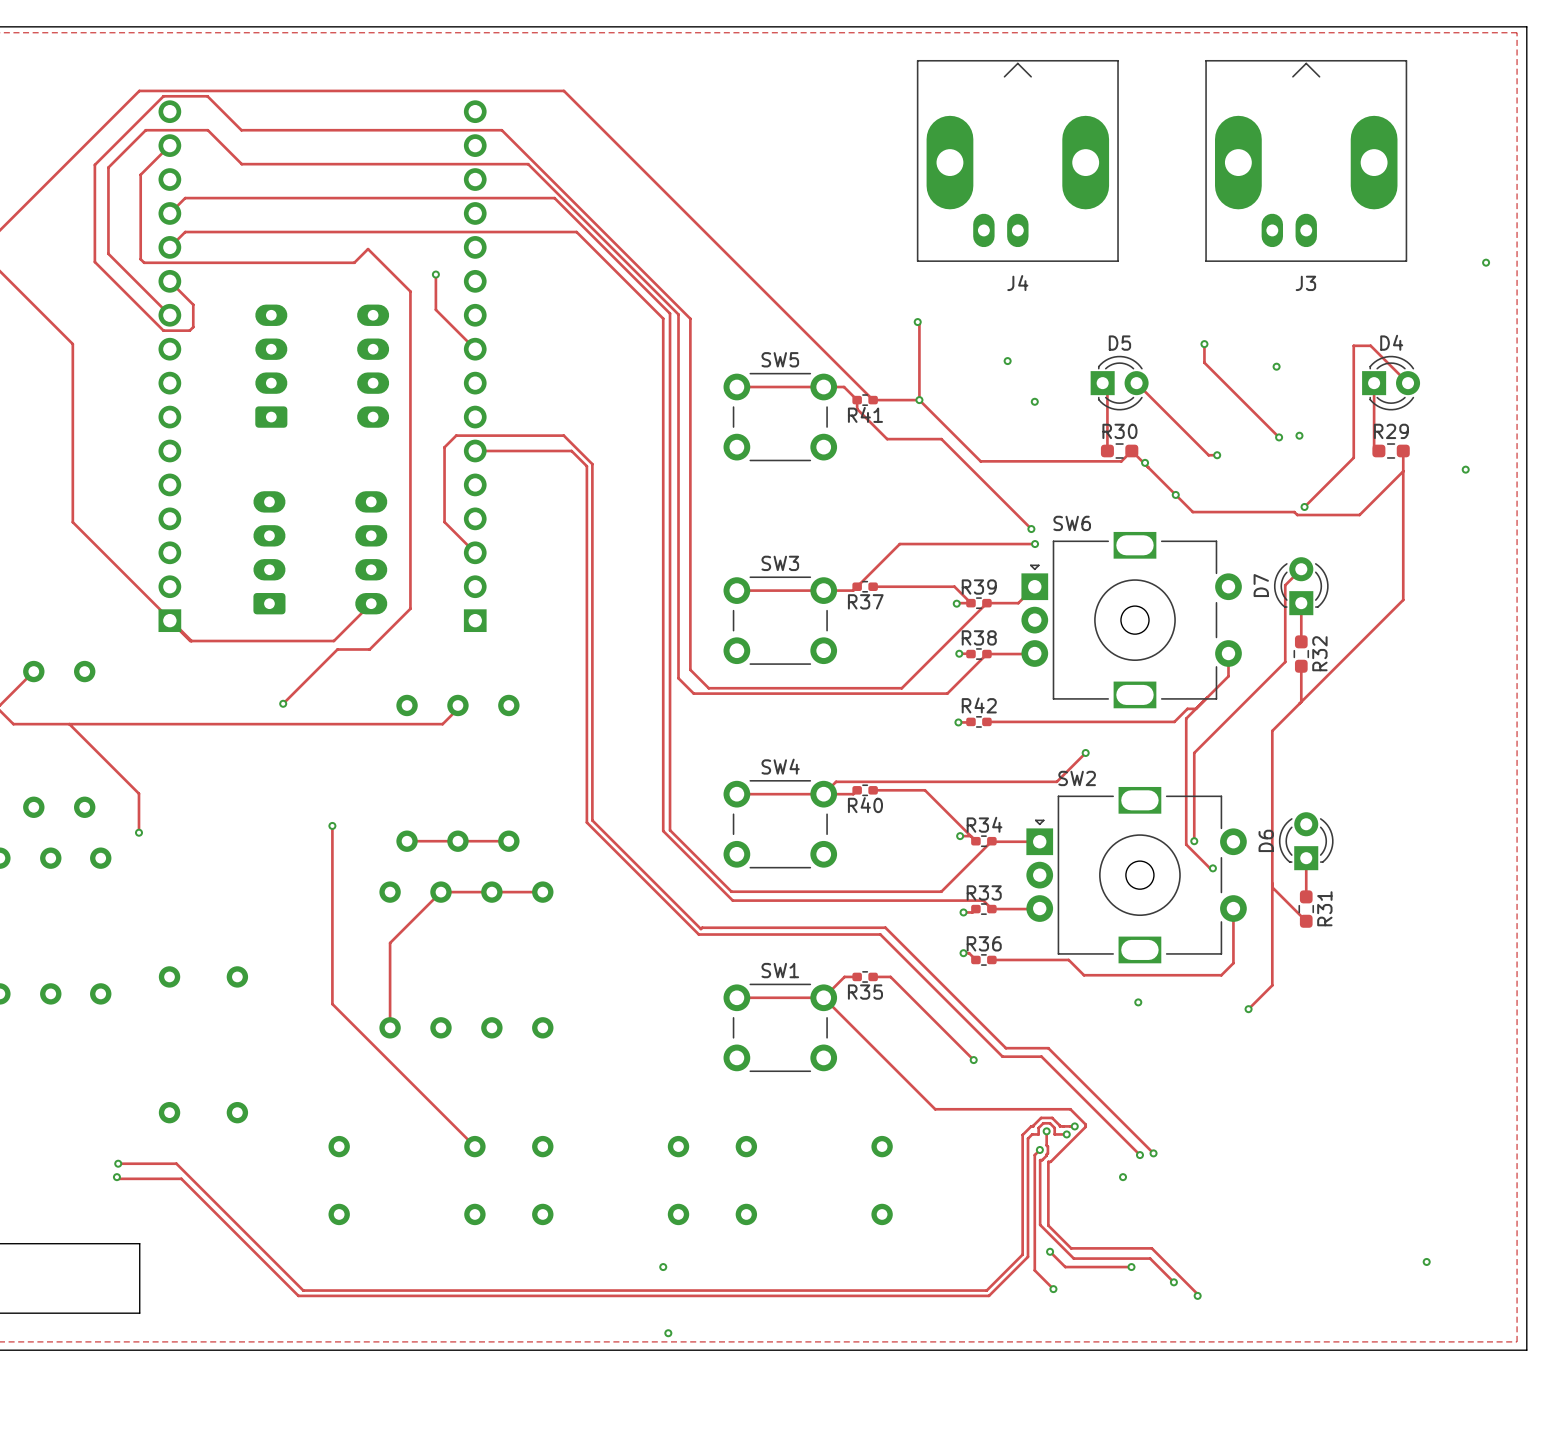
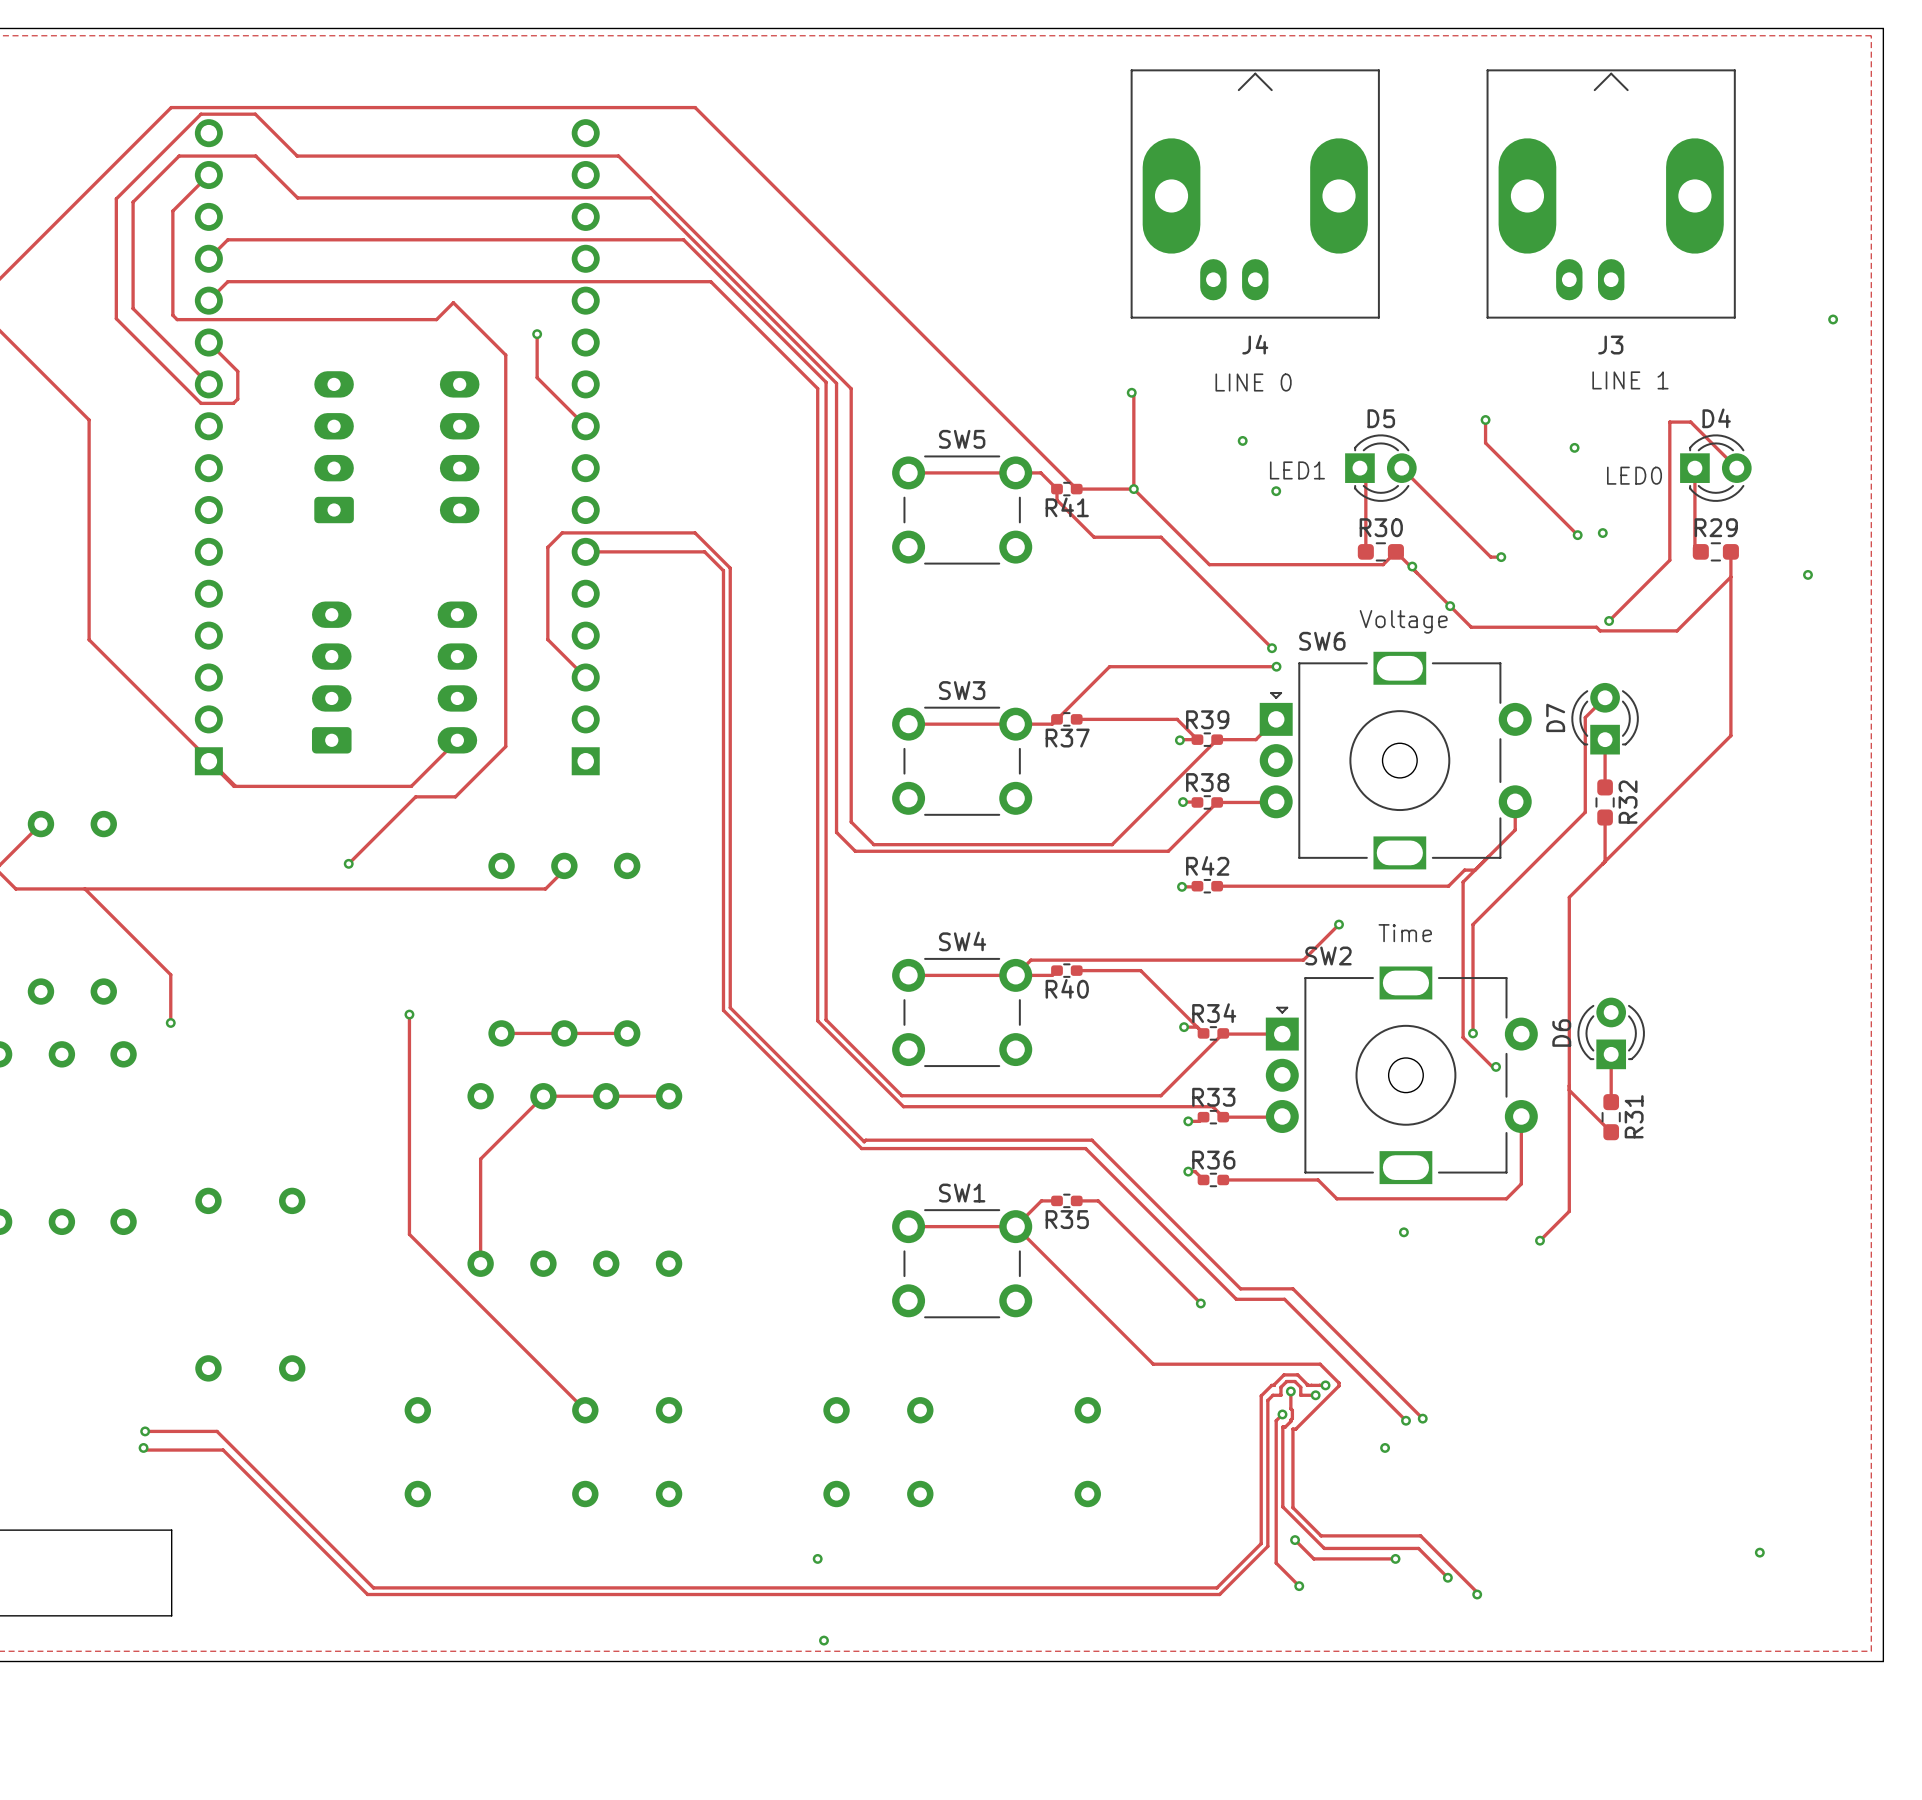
text: none -> LINE 1 (1630, 380)
text: none -> LINE 0 (1253, 382)
text: none -> LED1 (1297, 470)
text: none -> LED0 (1634, 475)
text: none -> Voltage (1403, 621)
text: none -> Time (1405, 933)

